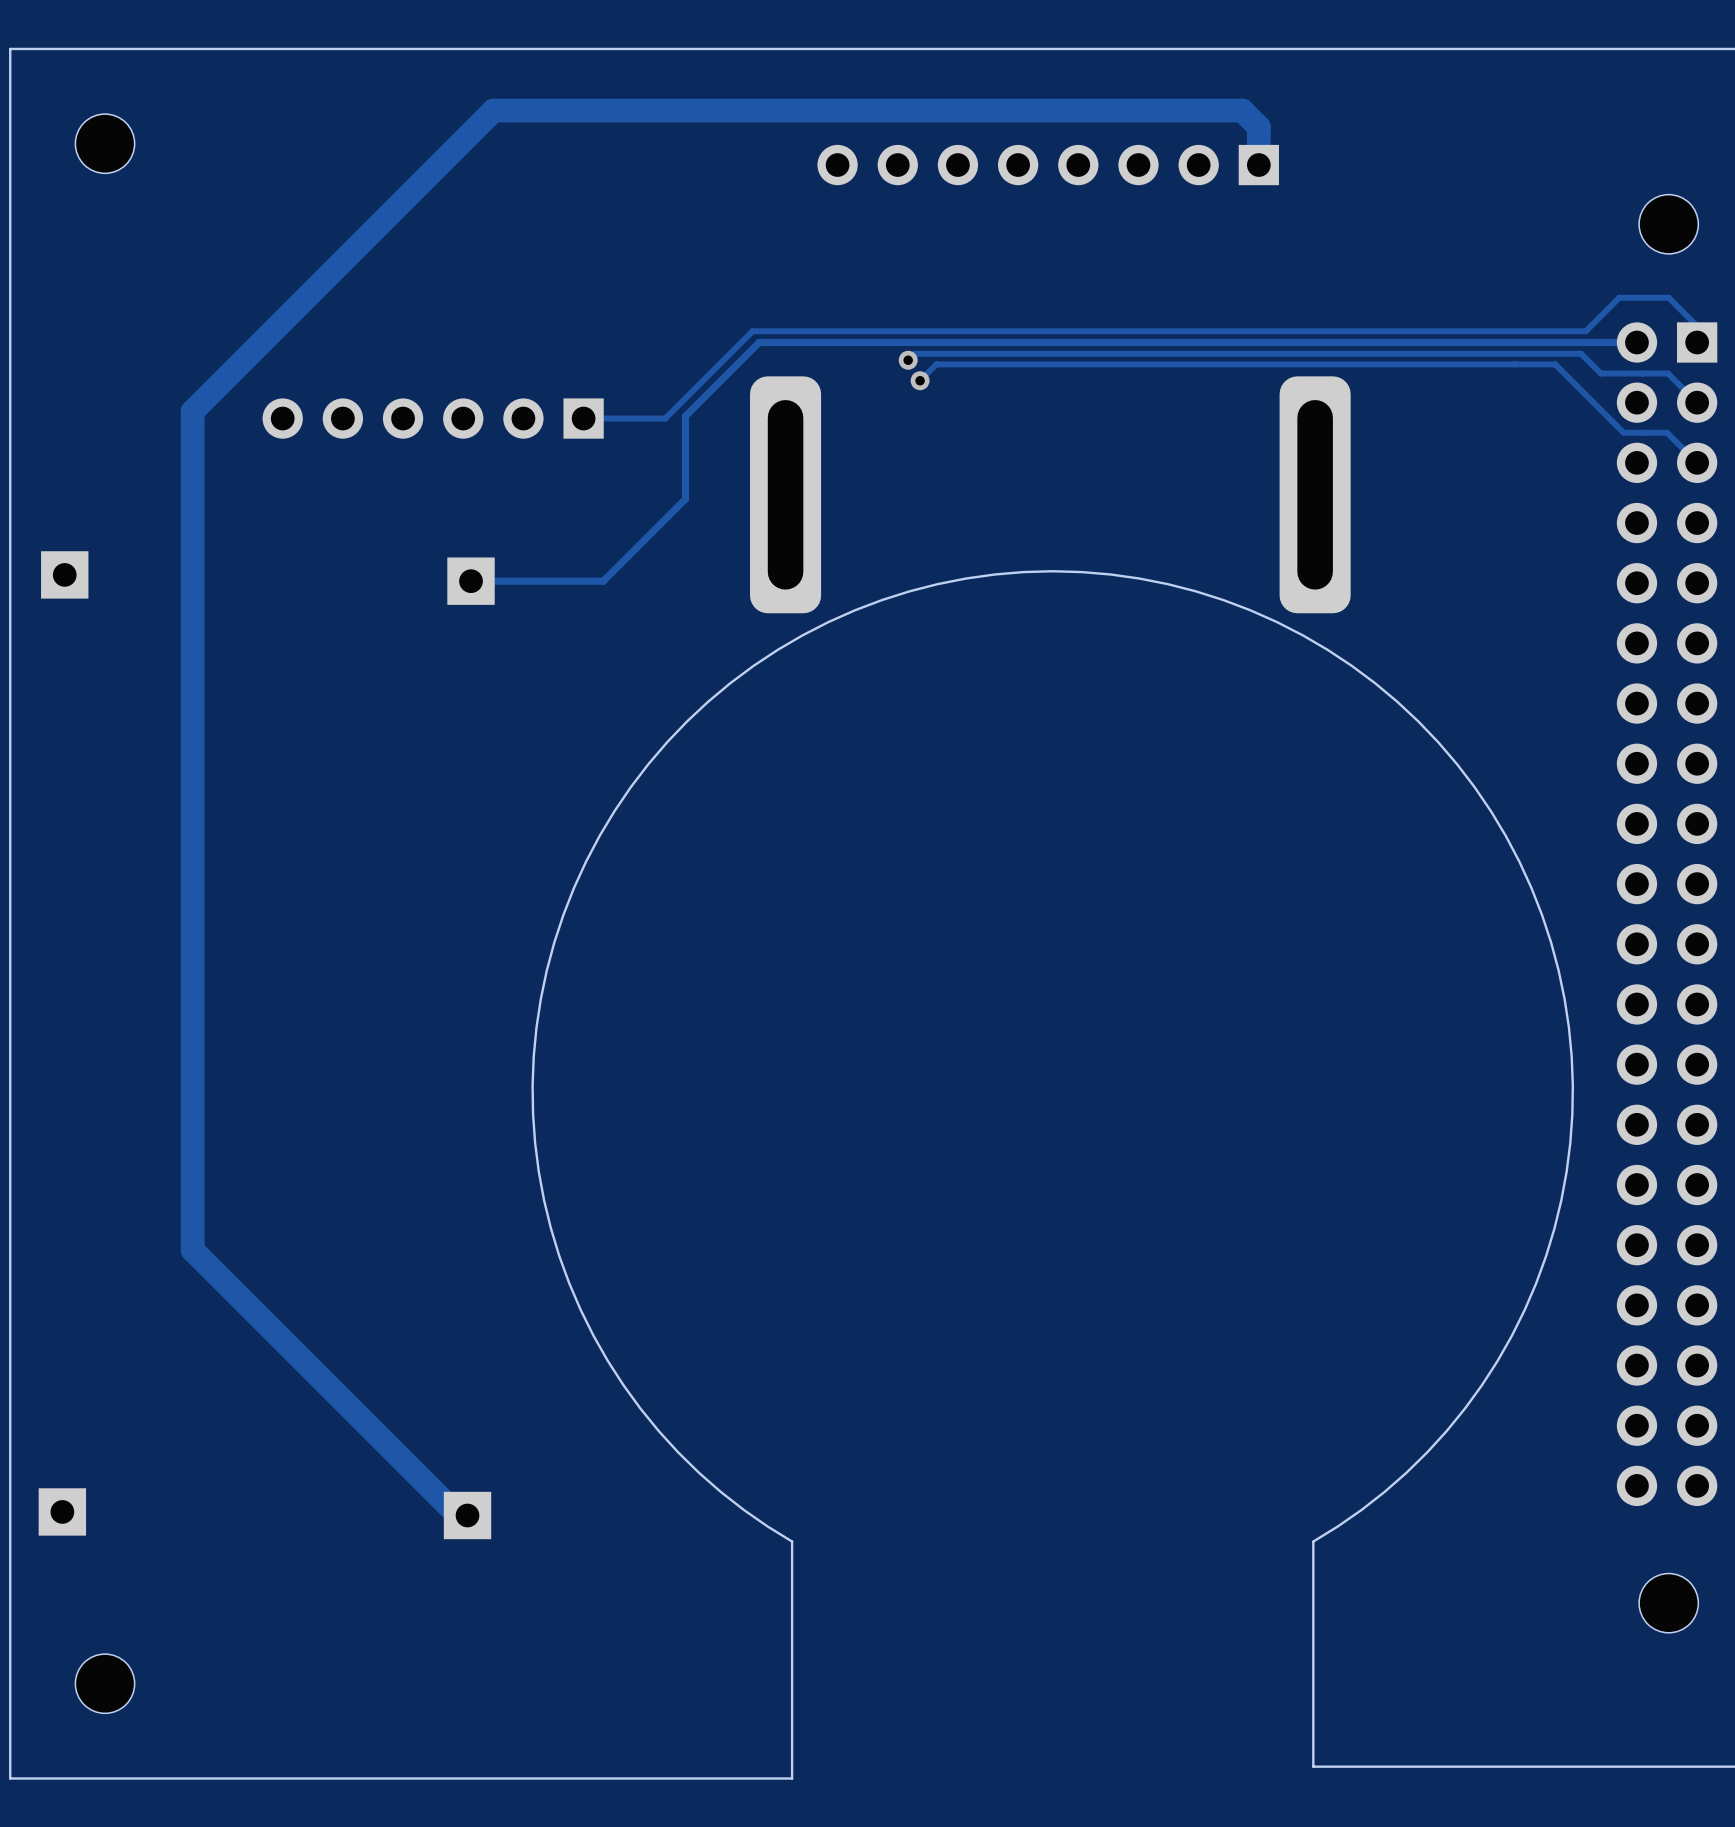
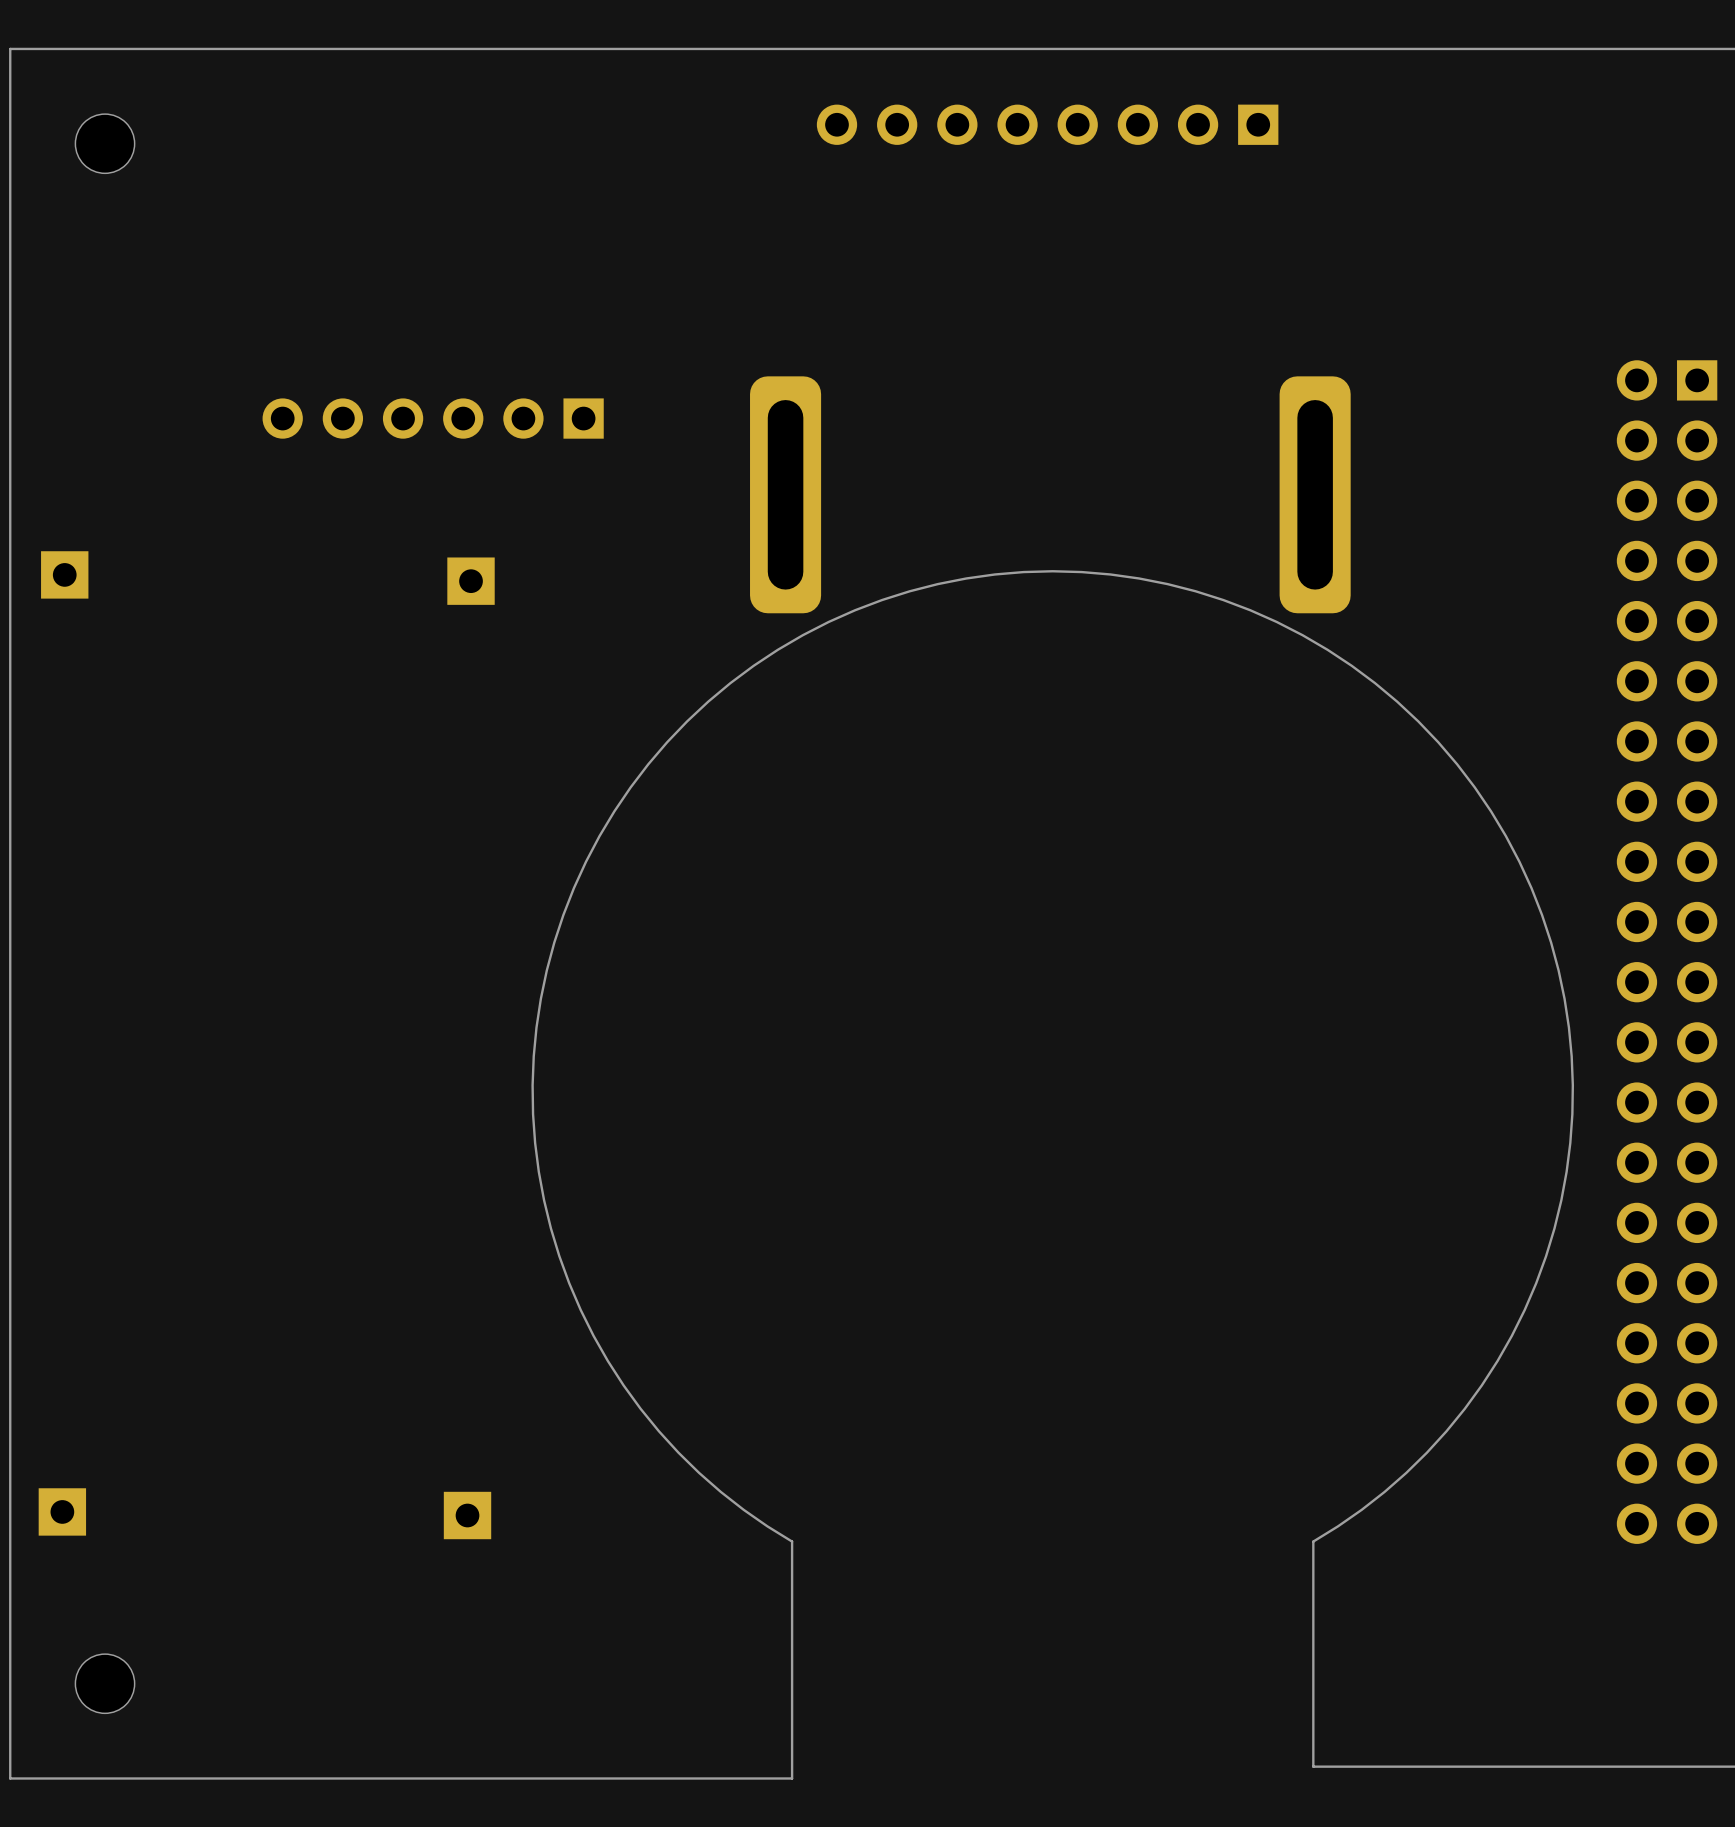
part position: (1048, 165) -> (1047, 124)
track: (1258, 165) (1258, 127) (1242, 110) (493, 110) (192, 411) (192, 1250) (458, 1515) (467, 1515) -> none
part: (1668, 224) -> none
track: (1636, 342) (759, 342) (685, 416) (685, 499) (603, 581) (471, 581) -> none
track: (1697, 342) (1697, 326) (1668, 297) (1619, 297) (1585, 331) (752, 331) (665, 418) (583, 418) -> none
track: (908, 360) (914, 353) (1581, 353) (1600, 373) (1668, 373) (1697, 402) -> none
via: (908, 360) -> none
track: (920, 380) (936, 364) (1555, 364) (1623, 432) (1667, 432) (1697, 462) -> none
via: (920, 380) -> none
part position: (1667, 914) -> (1667, 952)
part: (1668, 1603) -> none

